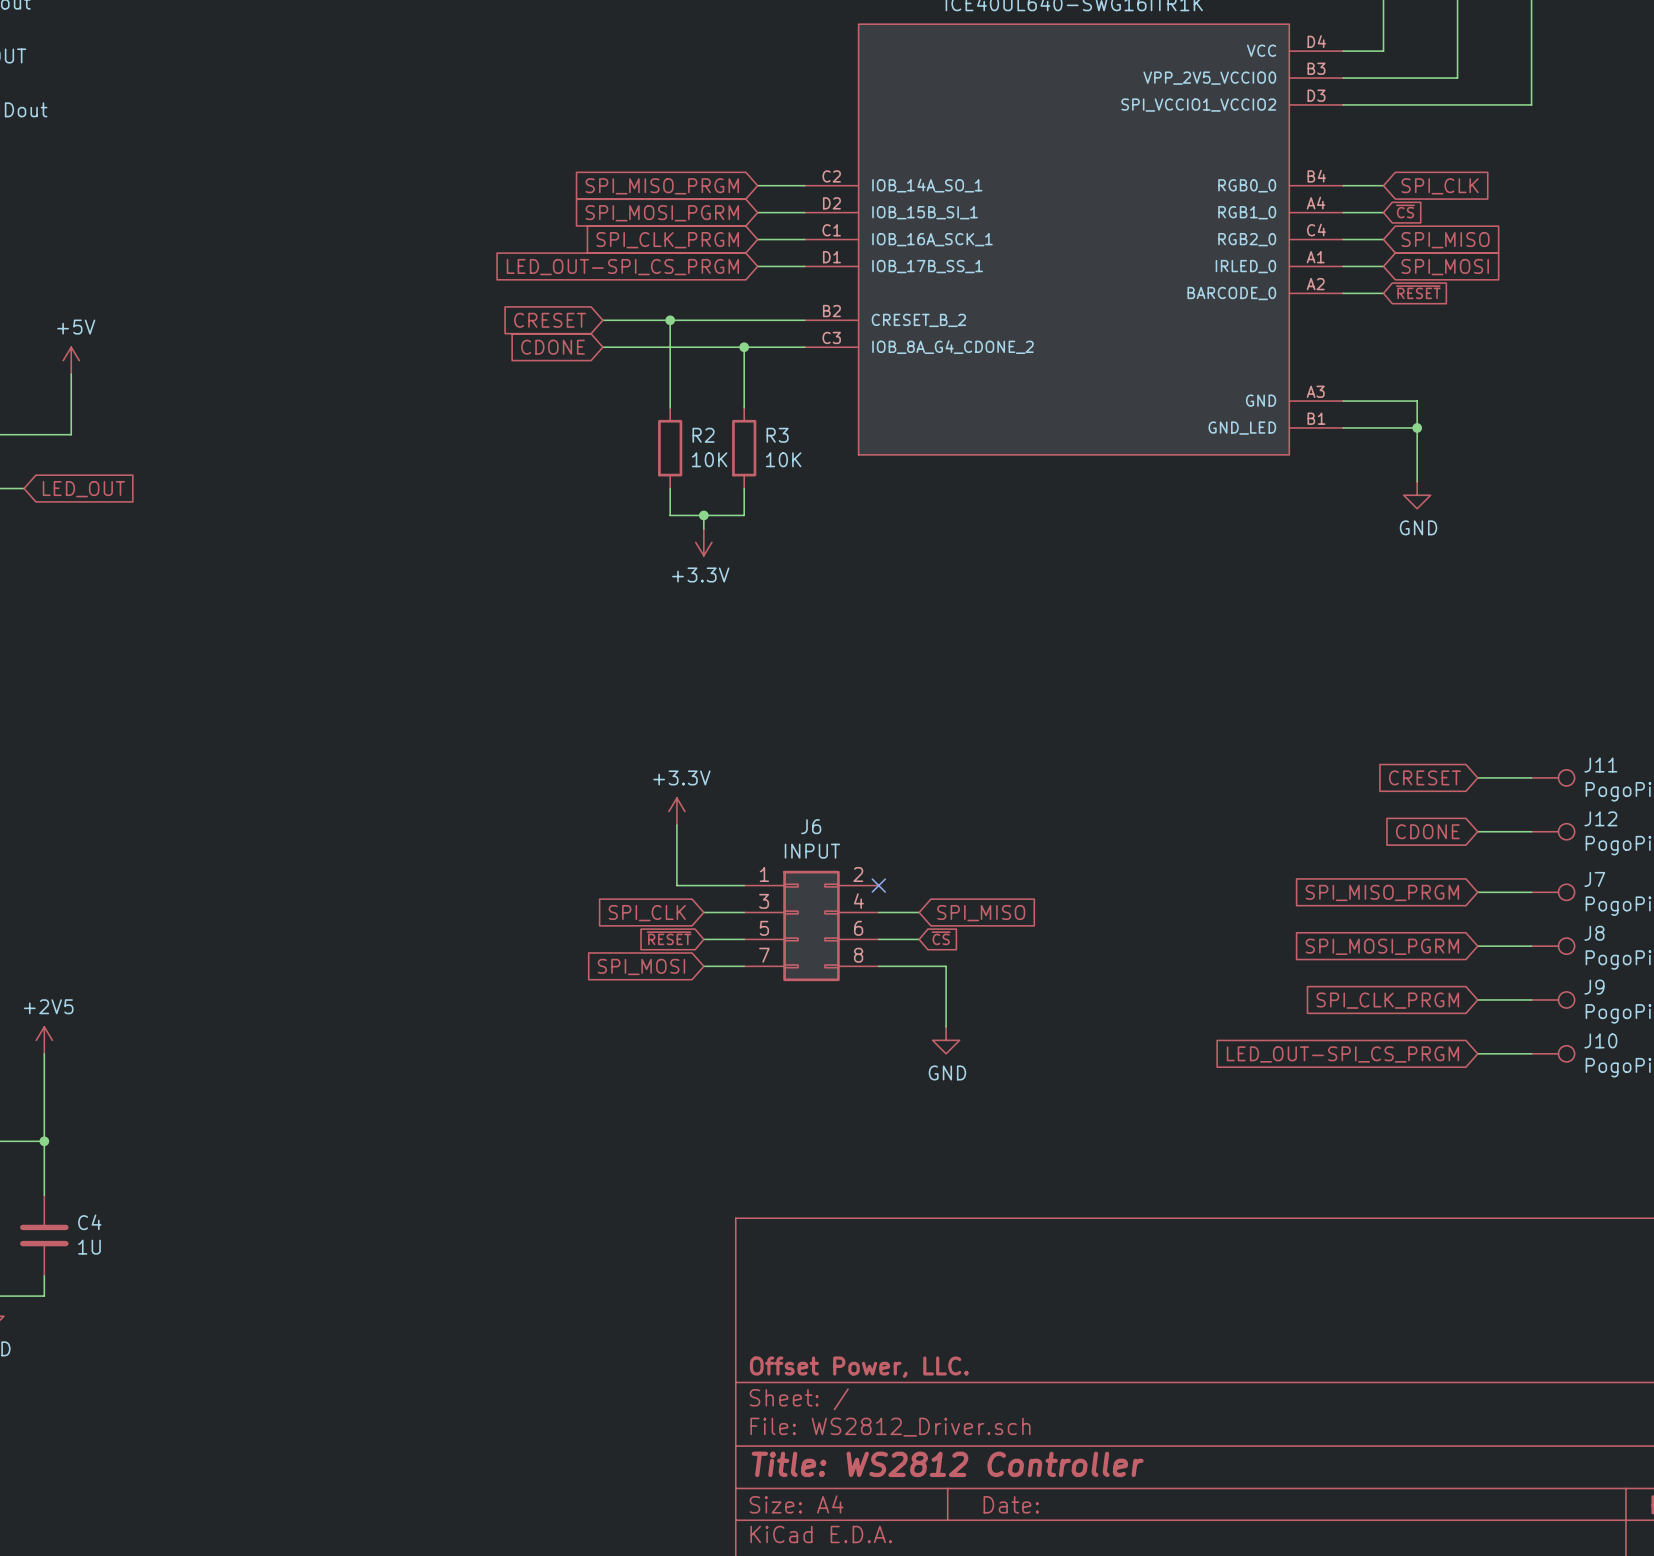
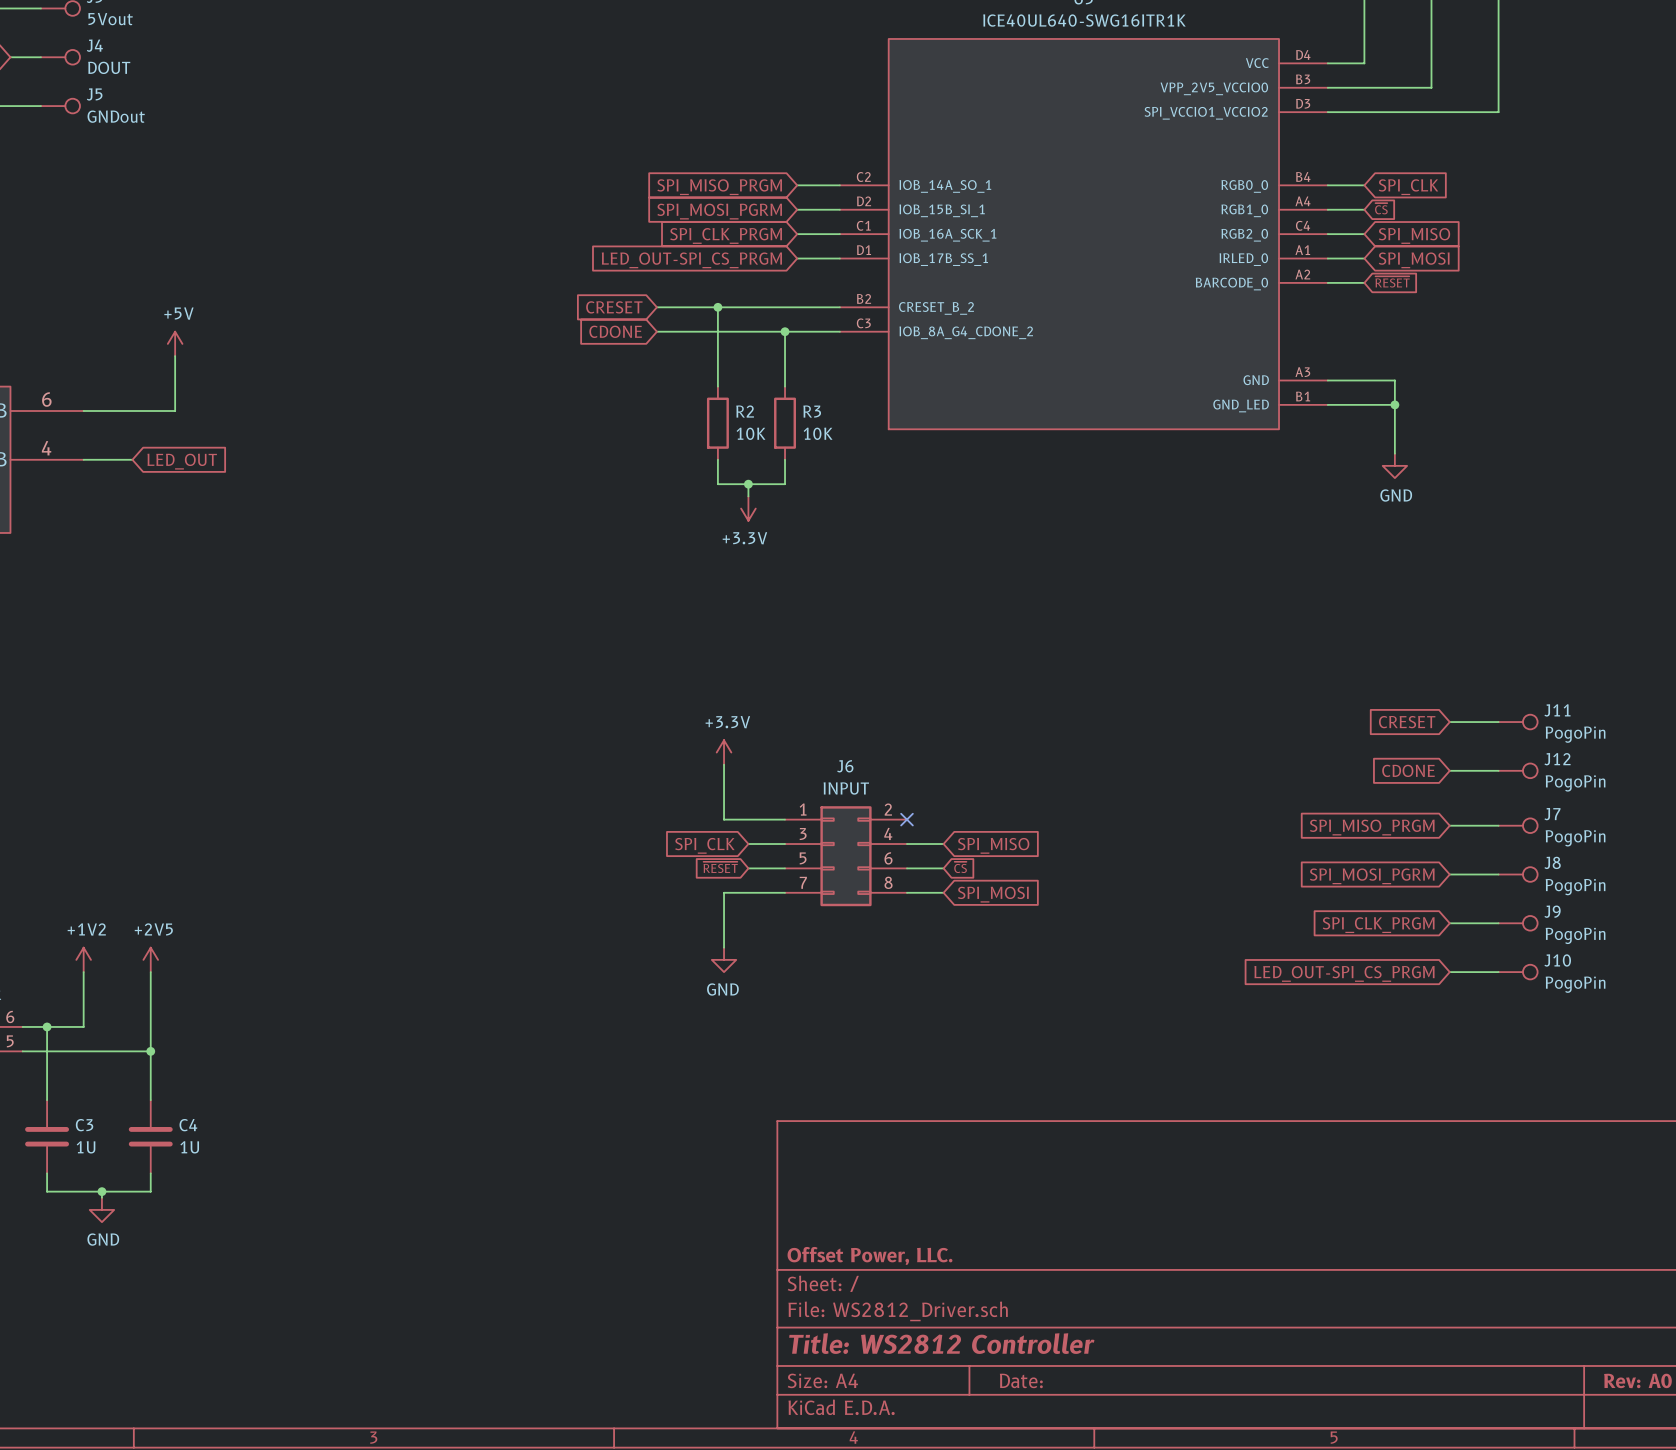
global label rotation: 0° (641, 966) -> 180° (993, 894)
global label position: SPI_MOSI (641, 966) -> SPI_MOSI (993, 894)
wire: none -> (748, 892) (724, 892) (724, 947)
wire: (919, 966) (946, 966) (946, 1026) -> none
power symbol: none -> GND (724, 959)
power symbol: GND (946, 1040) -> none

